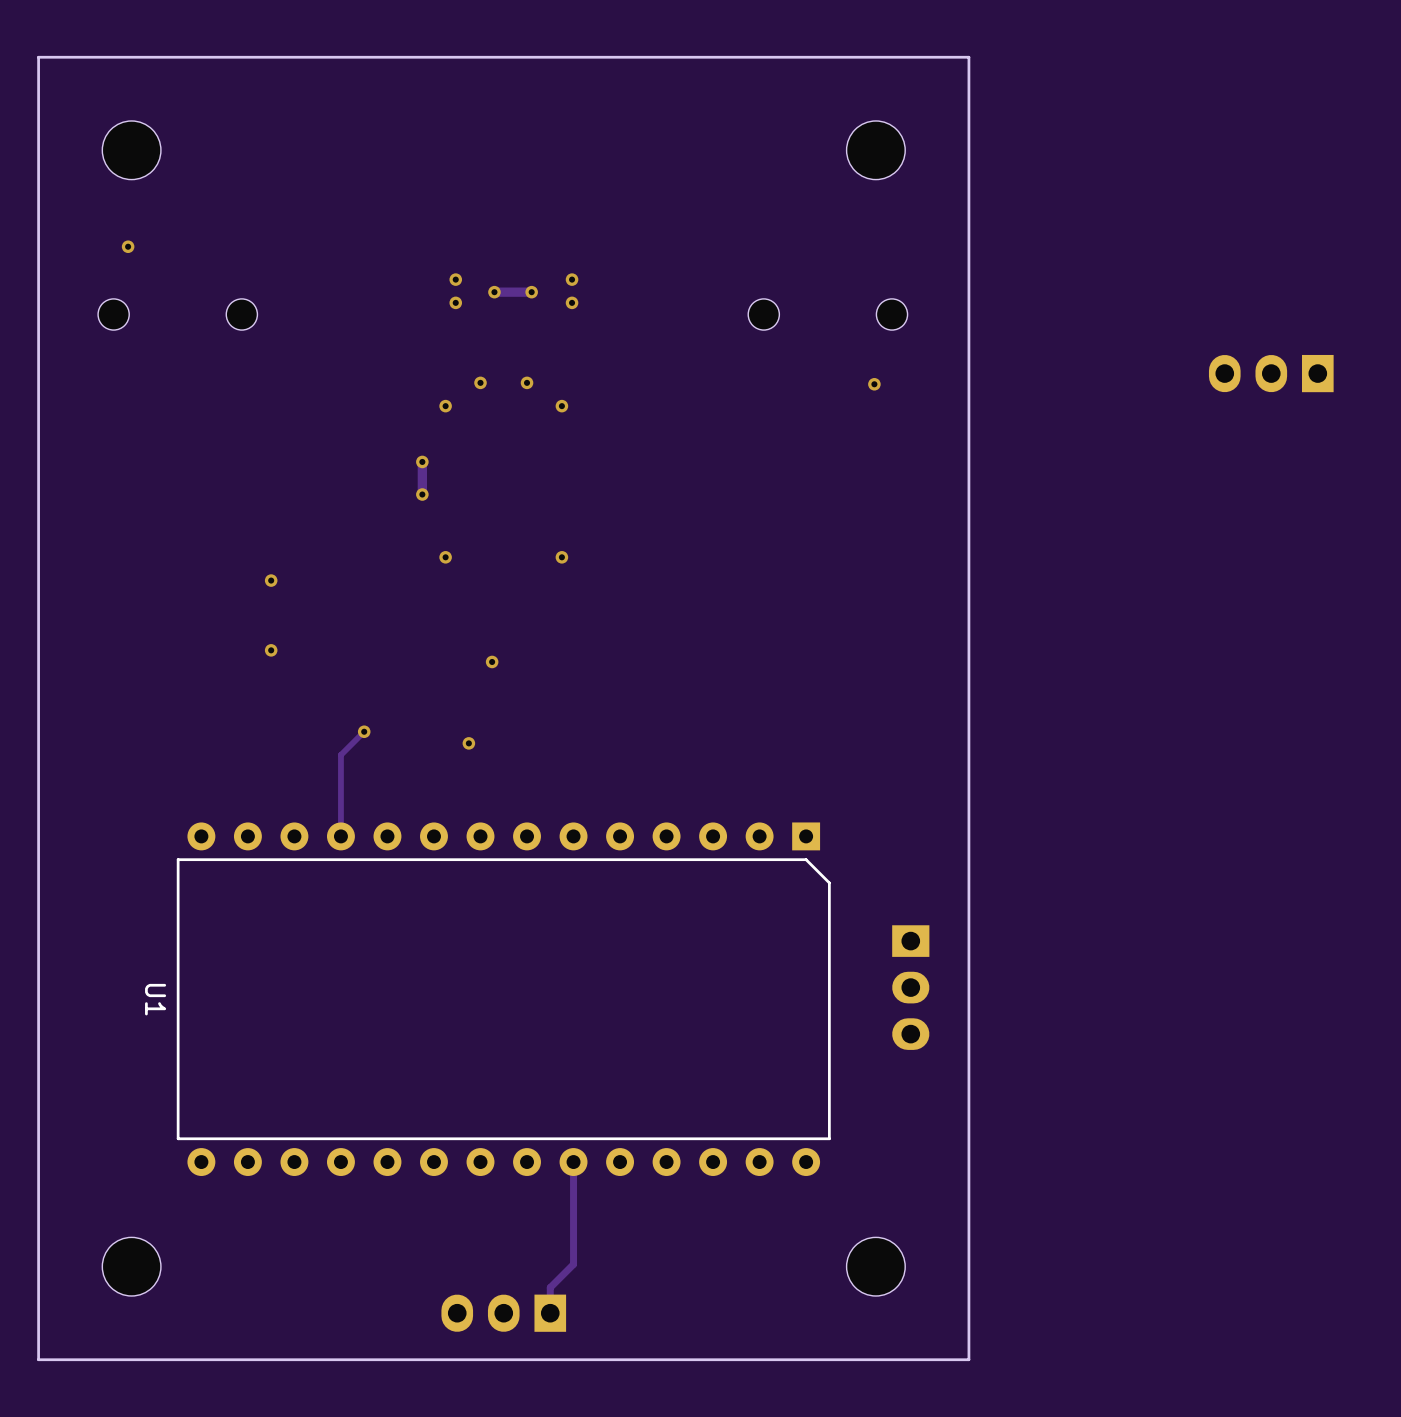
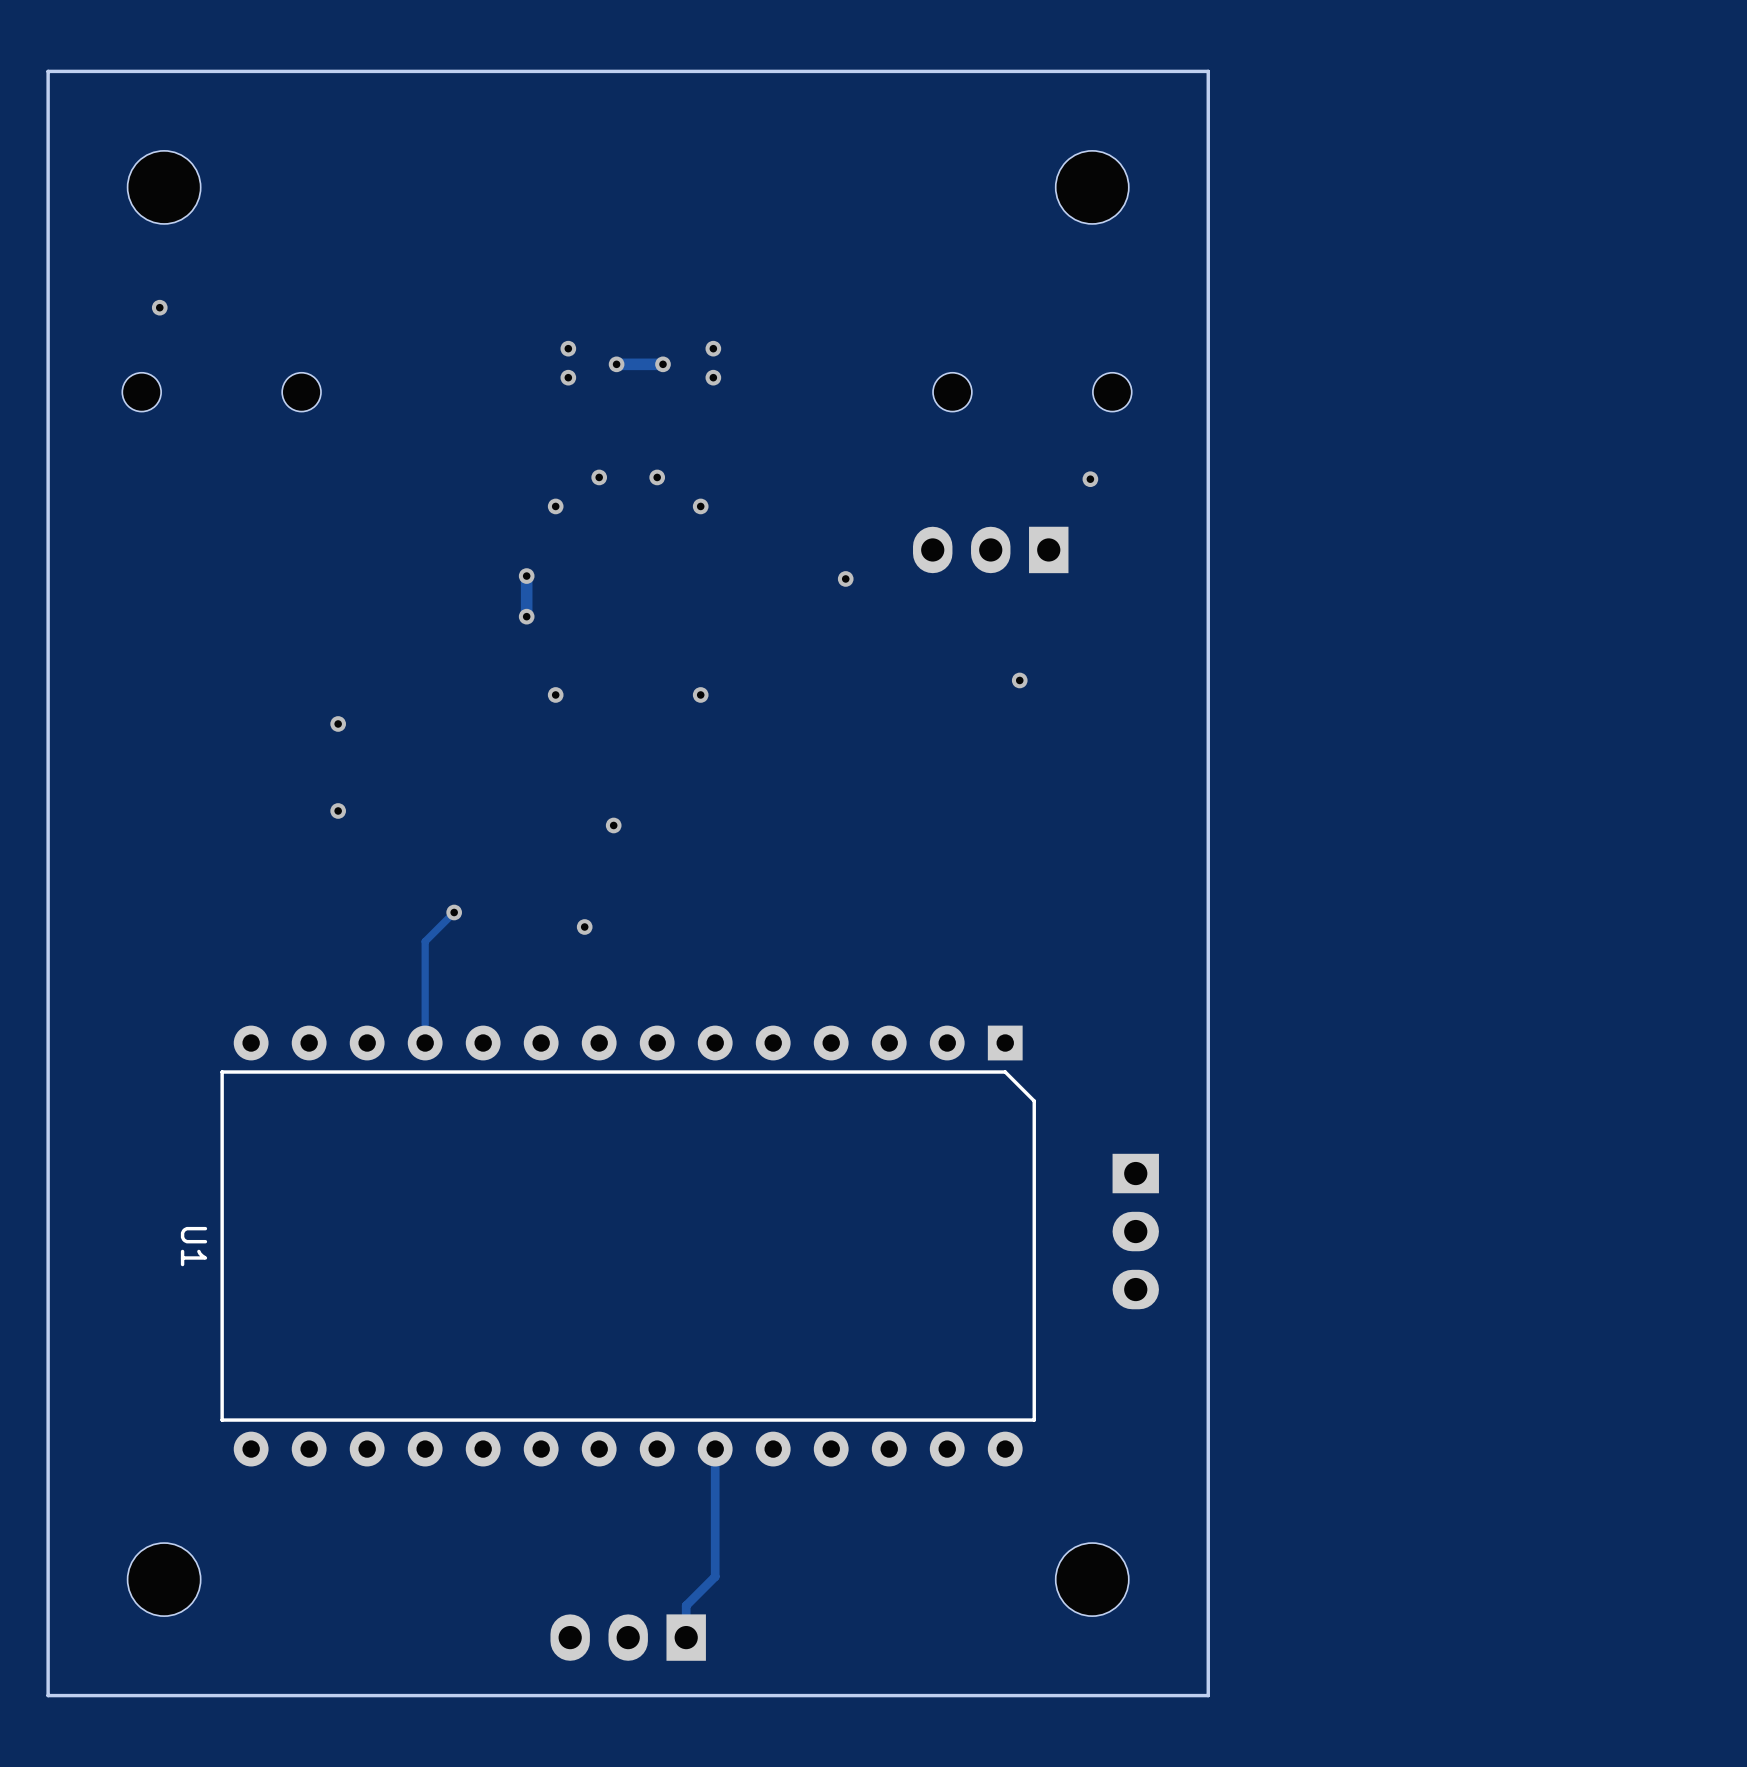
part: (1271, 373) -> none
part: none -> (990, 549)
via: none -> (845, 578)
via: none -> (1019, 680)

